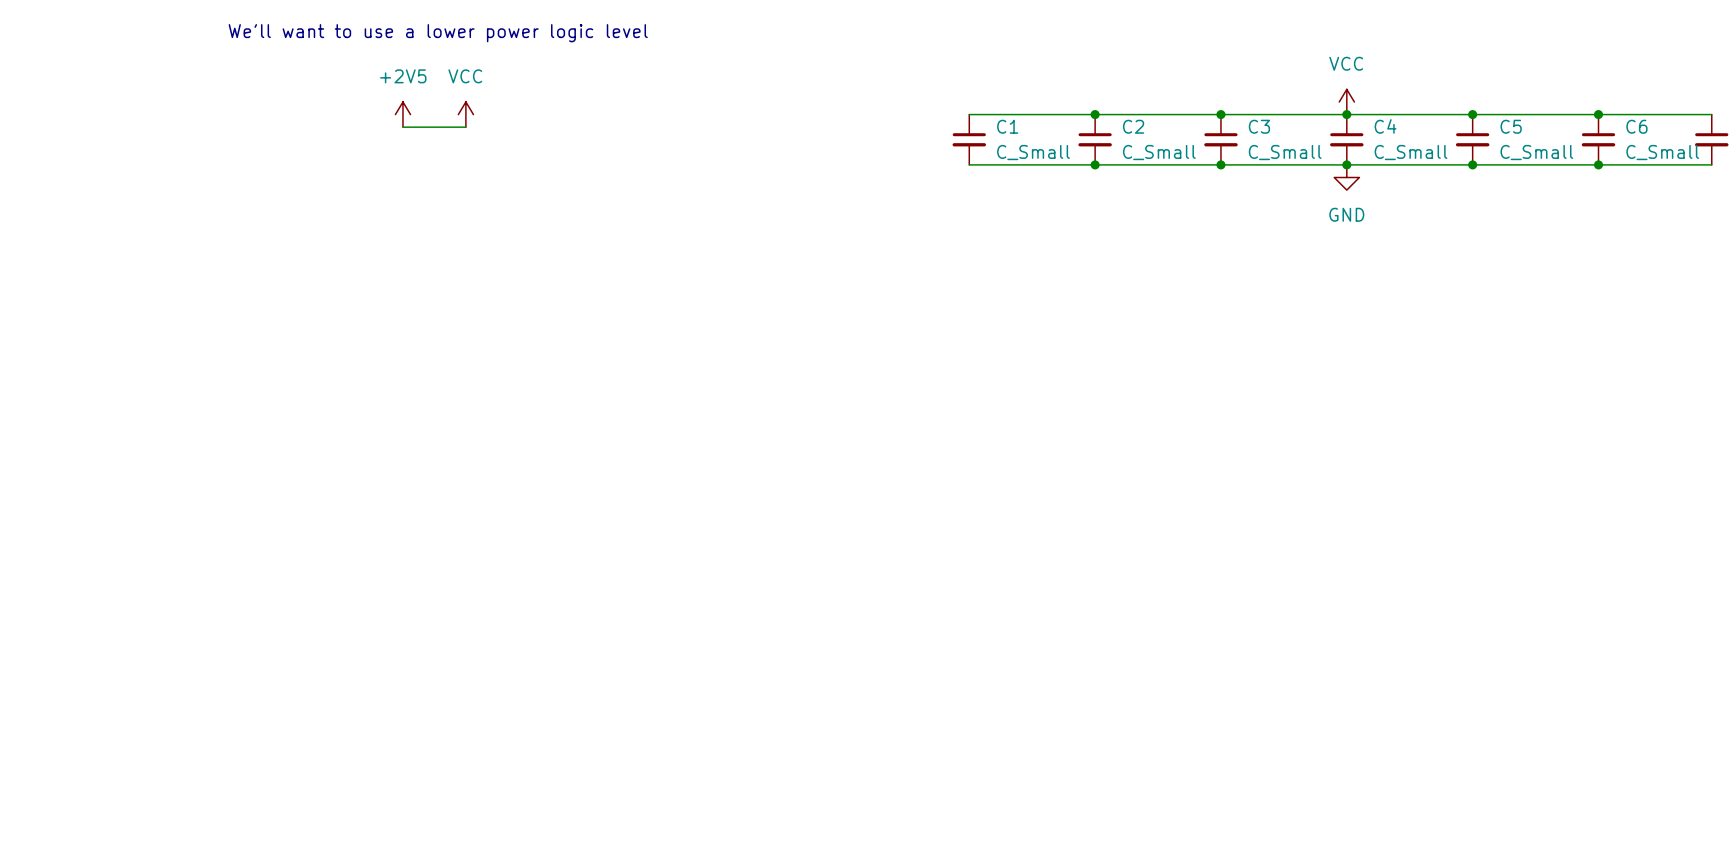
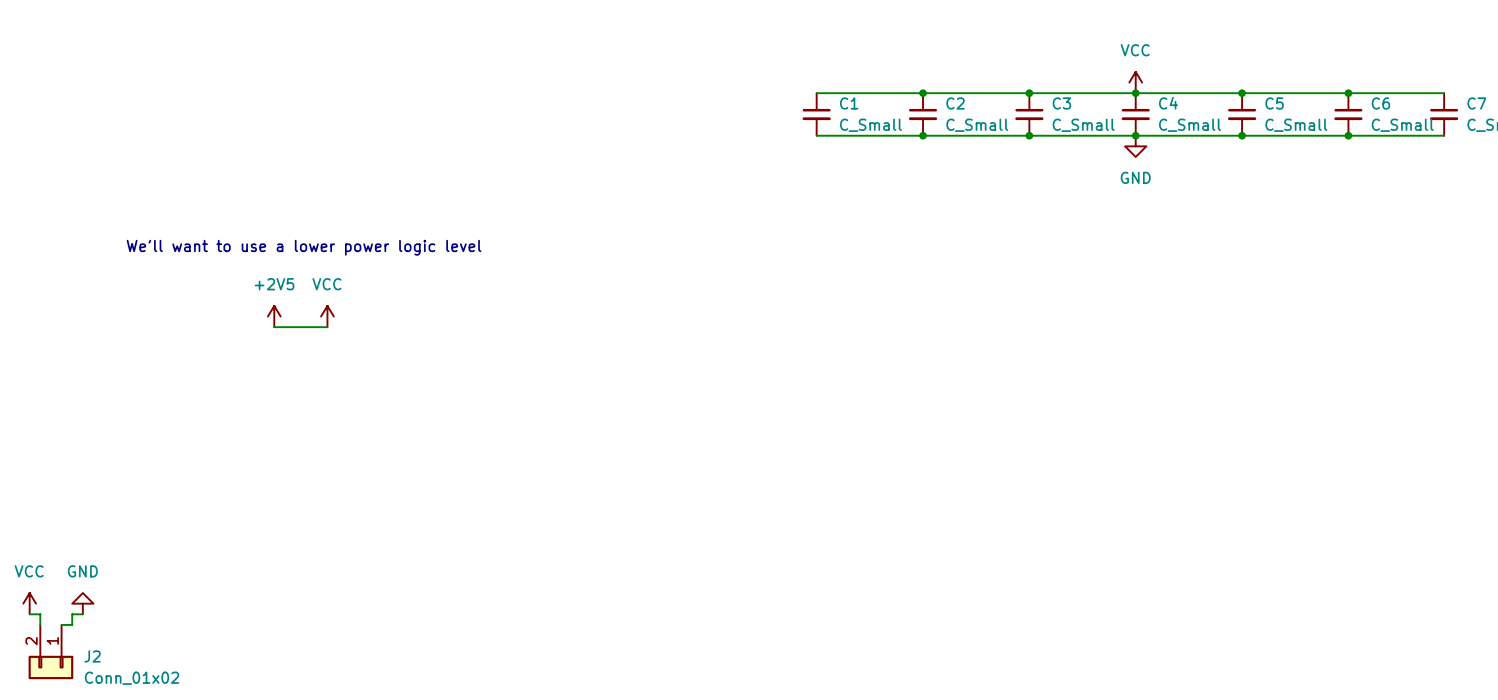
text: We'll want to use a lower power logic level (438, 33) -> none
power symbol: +2V5 (402, 114) -> none
power symbol: VCC (465, 114) -> none
wire: (402, 127) (465, 127) -> none
text: none -> We'll want to use a lower power logic level (304, 247)
power symbol: none -> +2V5 (274, 316)
power symbol: none -> VCC (327, 316)
wire: none -> (274, 327) (327, 327)
power symbol: none -> VCC (29, 603)
power symbol: none -> GND (82, 603)
wire: none -> (29, 614) (40, 614) (40, 624)
wire: none -> (82, 614) (72, 614) (72, 624) (61, 624)
J2: none -> Conn_01x02 (50, 652)

